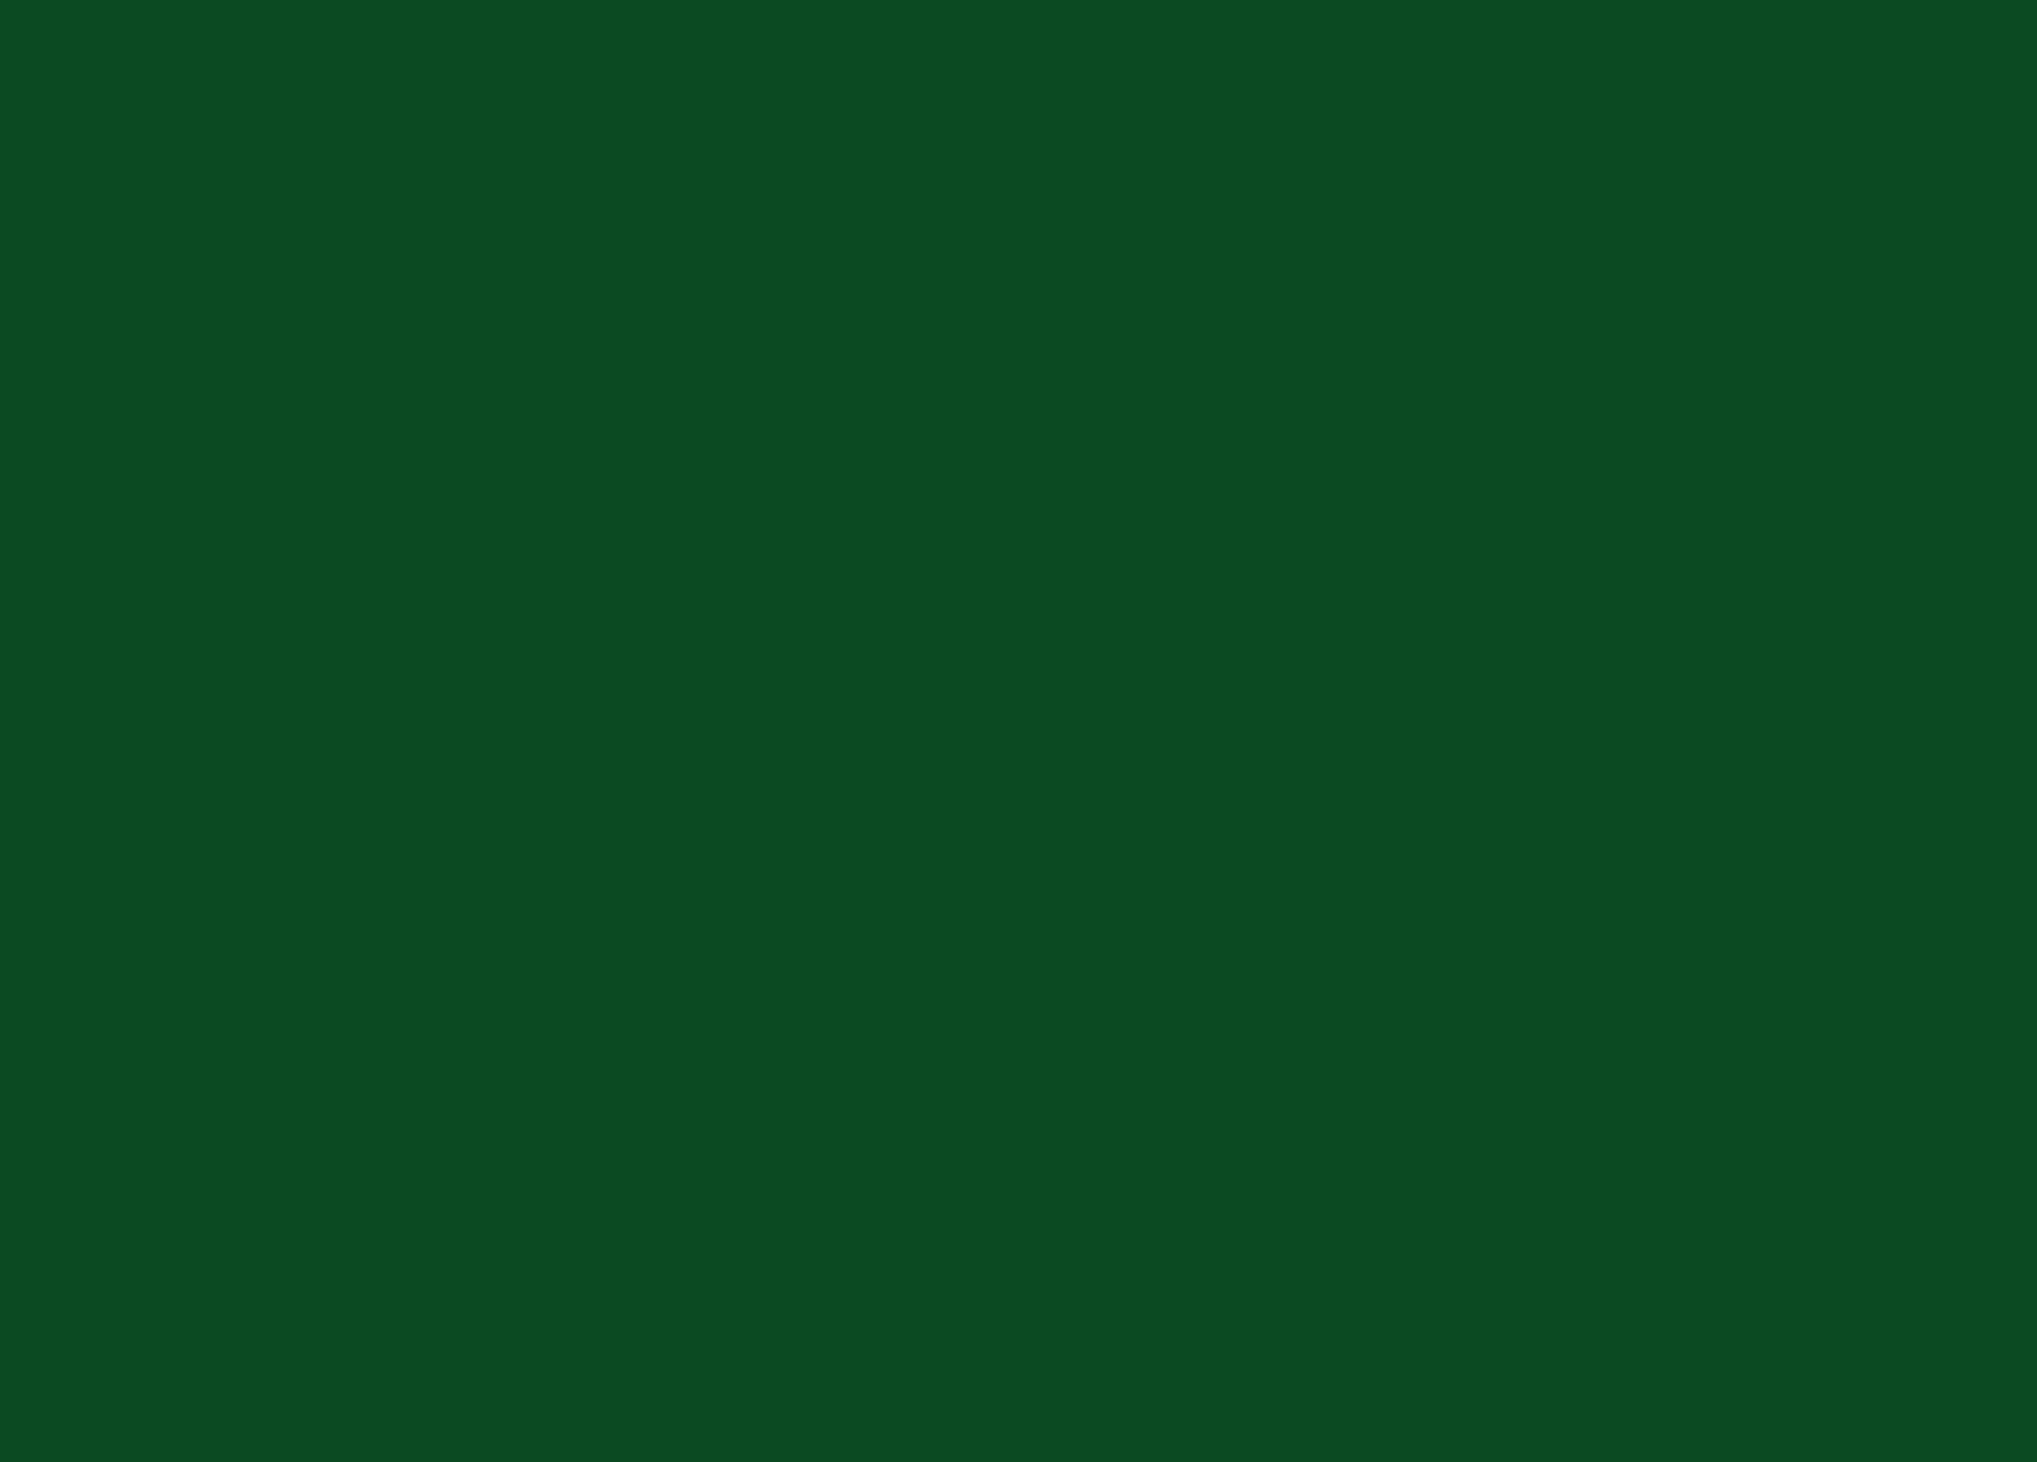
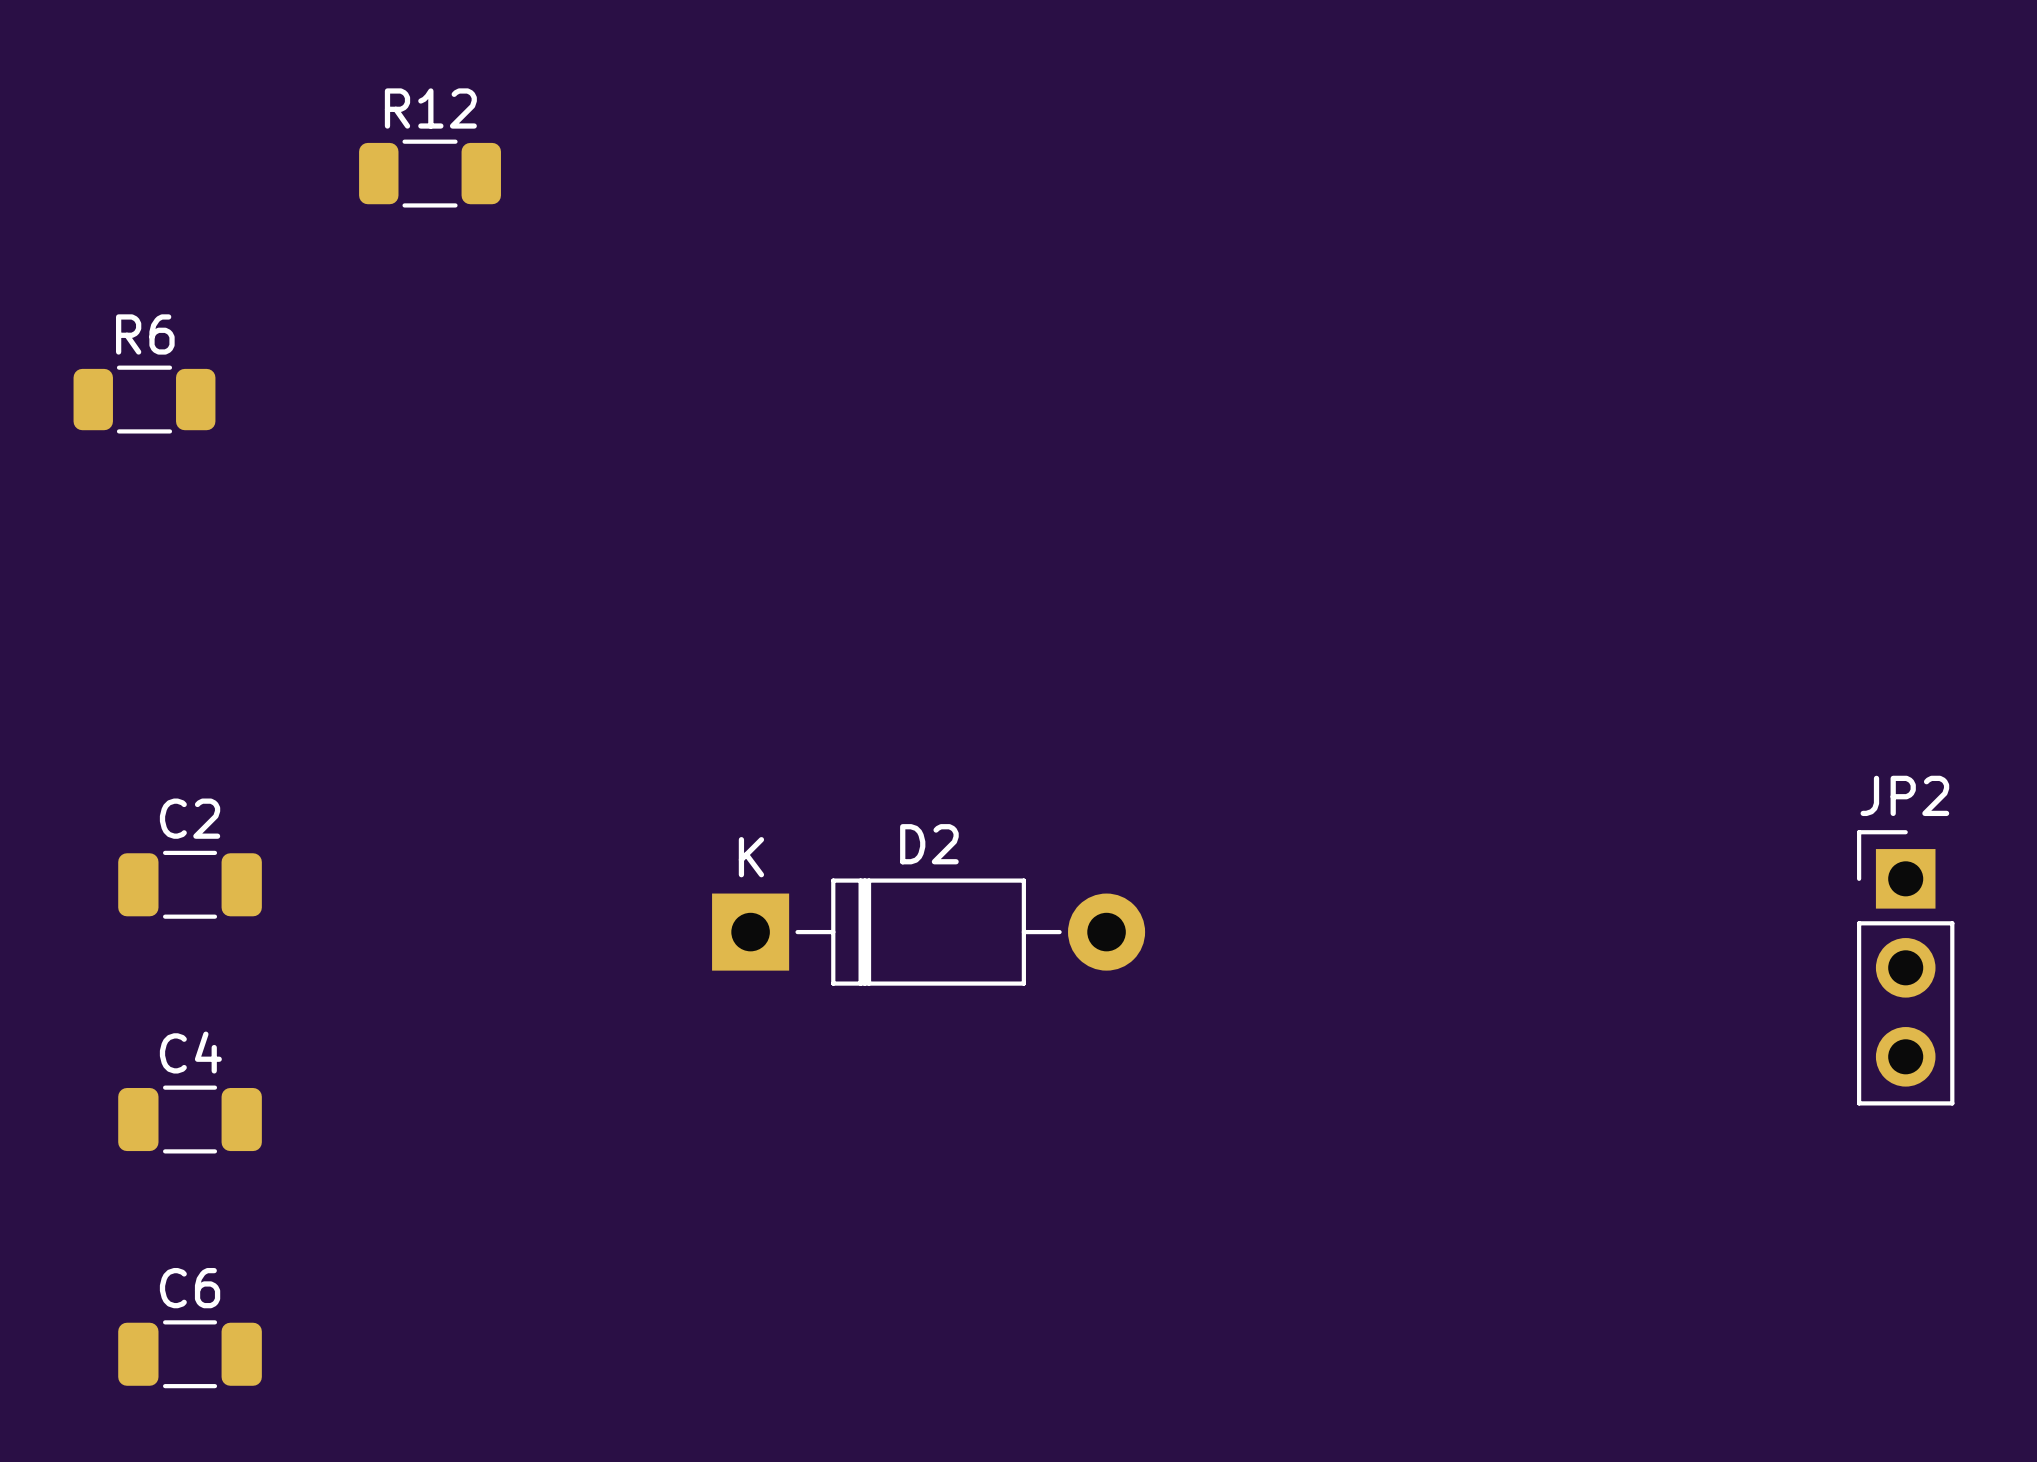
R12: none -> (430, 173)
R6: none -> (144, 399)
C2: none -> (190, 884)
D2: none -> (928, 932)
JP2: none -> (1905, 967)
C4: none -> (190, 1119)
C6: none -> (190, 1354)

